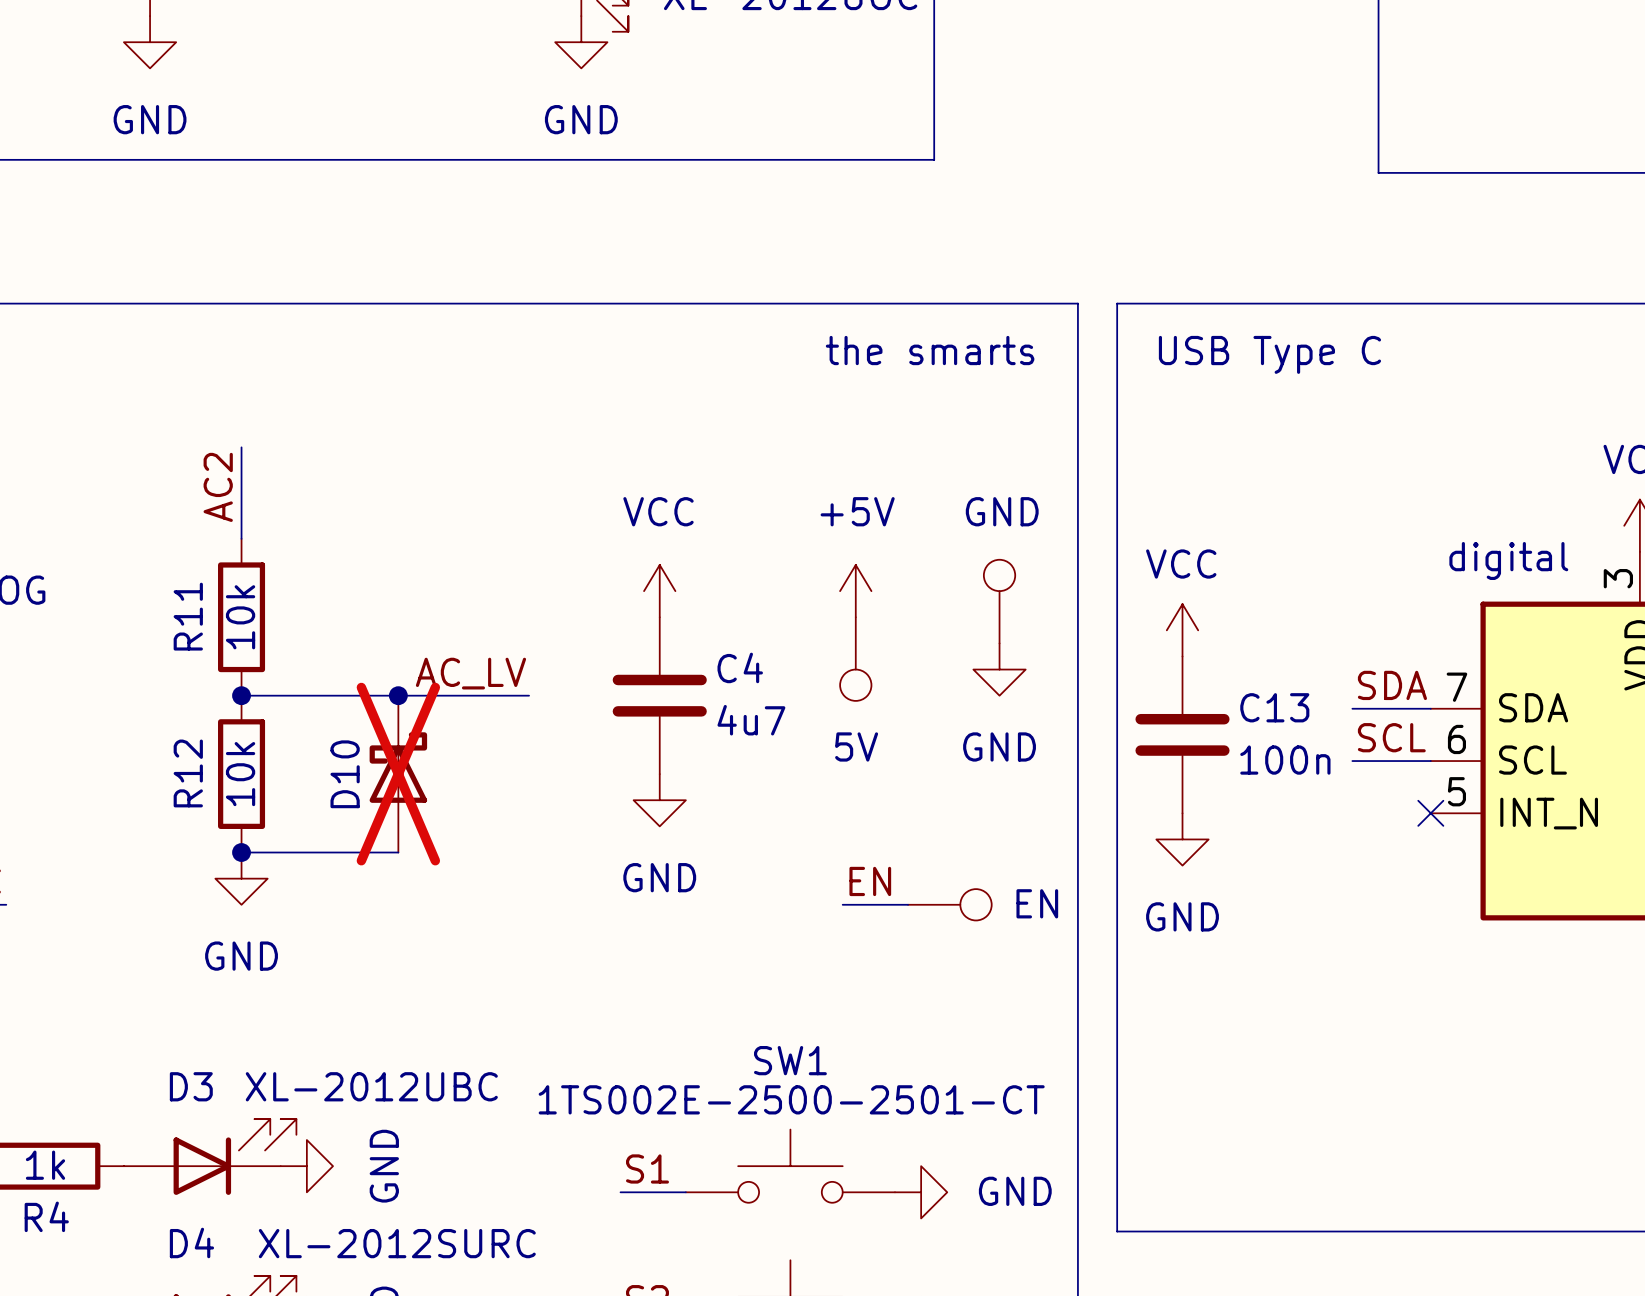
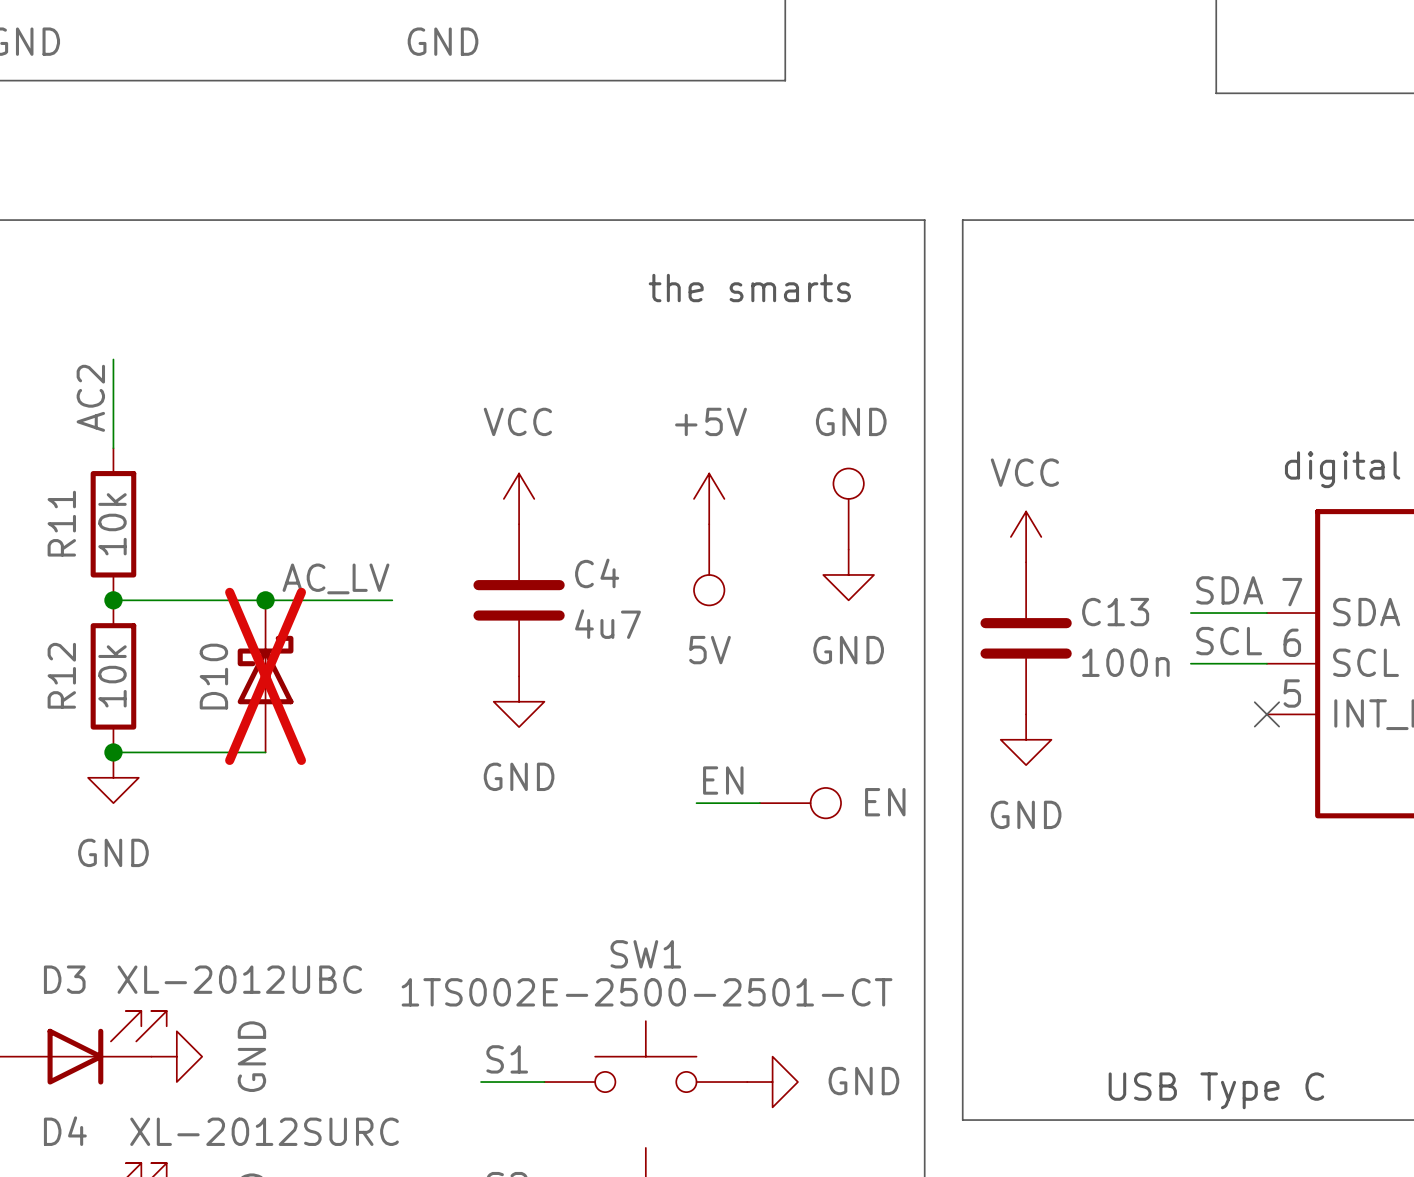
text position: the smarts (930, 350) -> the smarts (749, 288)
text: USB Type C (1269, 354) -> none
text: none -> USB Type C (1216, 1090)

